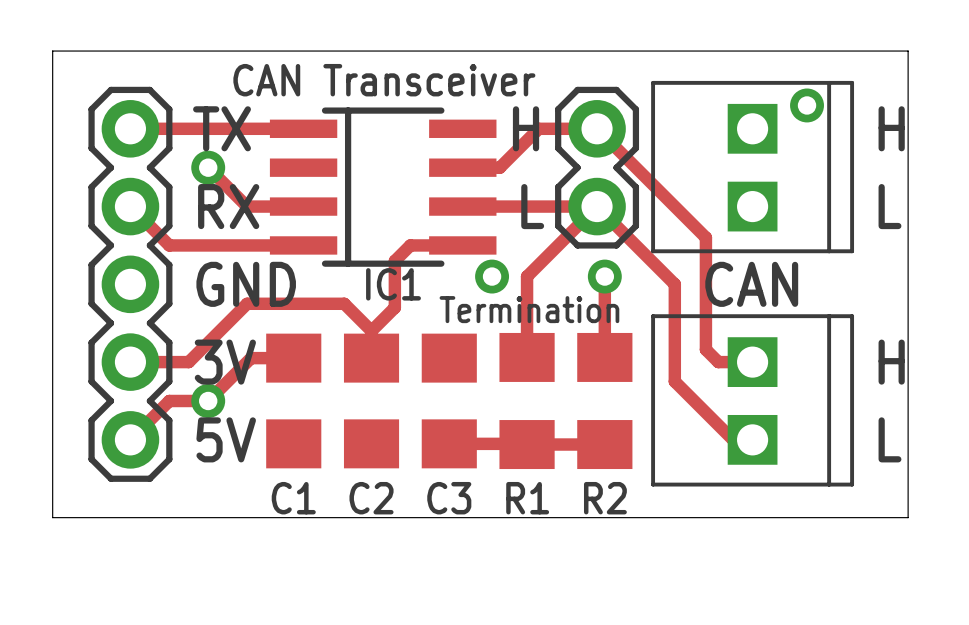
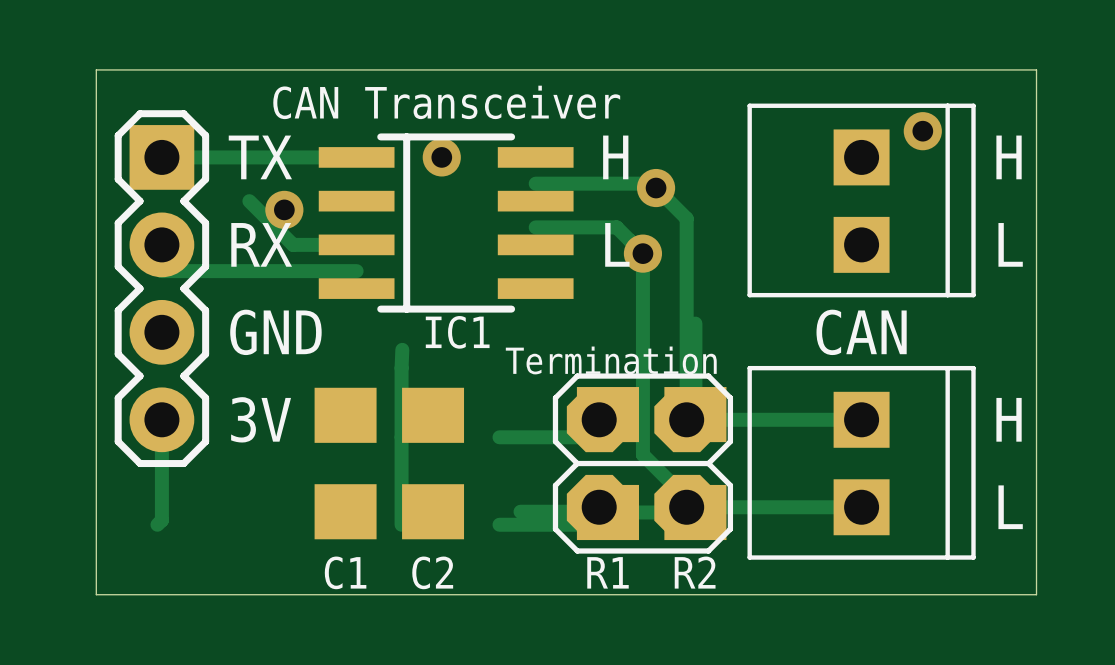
board edge: (72, 51) (52, 51) (52, 517) (72, 517) -> (96, 69) (96, 594)
via: none -> (441, 157)
via: none -> (656, 188)
via position: (208, 167) -> (284, 209)
track: (462, 167) (499, 167) (538, 128) (597, 128) (705, 237) (705, 349) (718, 362) -> (535, 183) (651, 183) (686, 218) (686, 419) (823, 419)
part: (597, 167) -> none
track: (130, 206) (169, 245) (303, 245) -> (161, 244) (161, 271) (356, 271)
track: (462, 206) (597, 206) -> none
track: (597, 206) (674, 284) (674, 381) (733, 439) -> (535, 227) (616, 227) (642, 253) (642, 454) (686, 498) (686, 507) (839, 507)
track: (597, 206) (527, 276) (527, 357) -> none
via: none -> (642, 253)
part: none -> (161, 288)
track: (460, 247) (462, 245) (410, 245) (394, 261) (394, 307) (371, 331) -> none
via: (492, 276) -> none
via: (604, 276) -> none
part: (130, 284) -> none
track: none -> (402, 349) (401, 524)
track: (371, 331) (344, 303) (247, 303) (188, 362) (130, 362) -> (157, 524) (161, 520) (161, 419)
track: (293, 358) (251, 358) (208, 400) (169, 400) (130, 439) -> none
track: none -> (599, 419) (581, 437) (499, 437)
via: (208, 400) -> none
C3: (449, 400) -> none
part: none -> (642, 463)
text: 5V (226, 439) -> none
track: none -> (599, 507) (581, 524) (499, 524)

